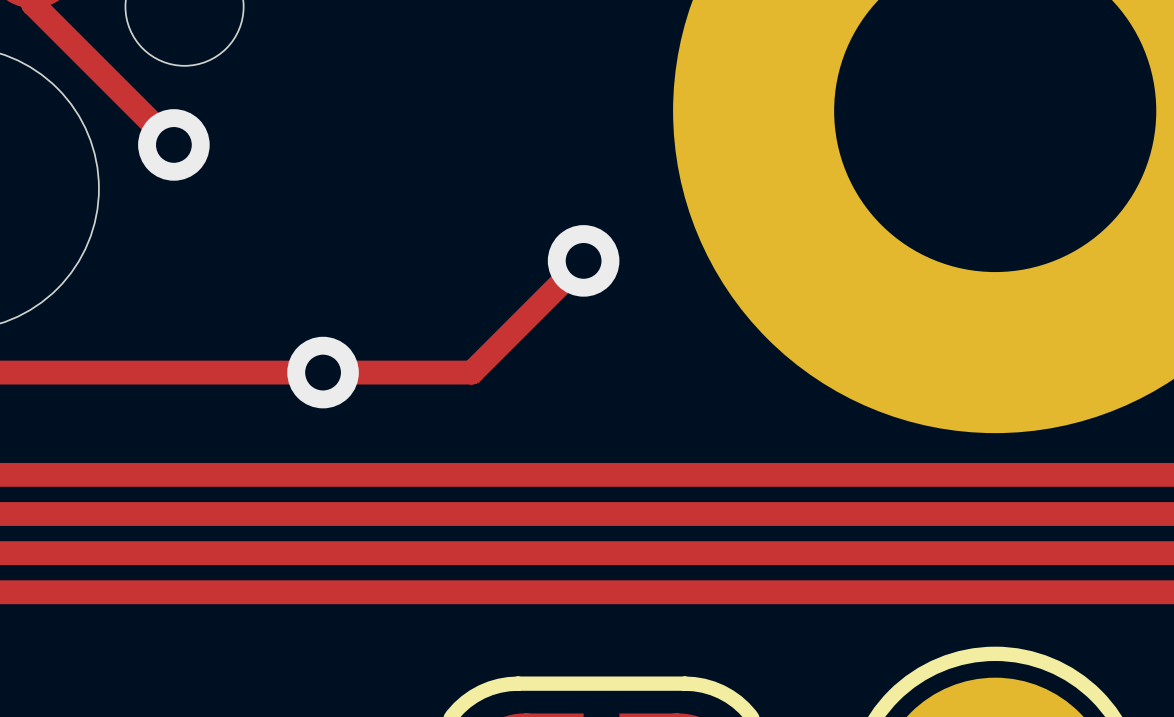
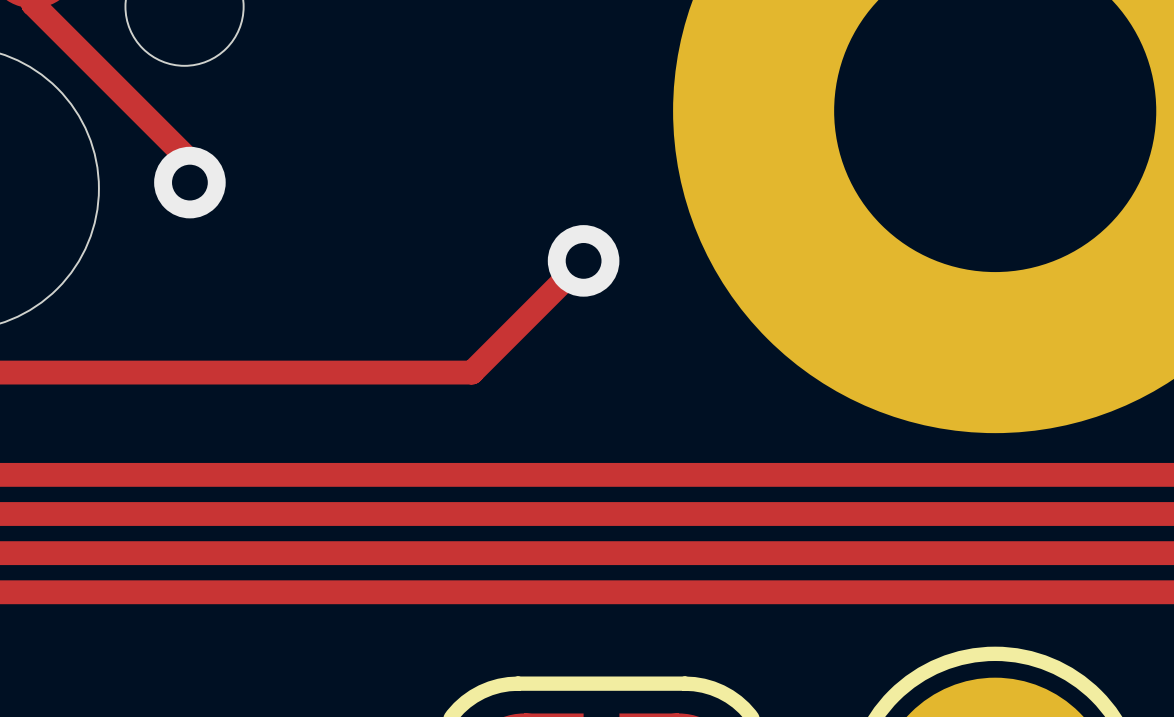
via position: (173, 144) -> (189, 182)
via: (323, 372) -> none

